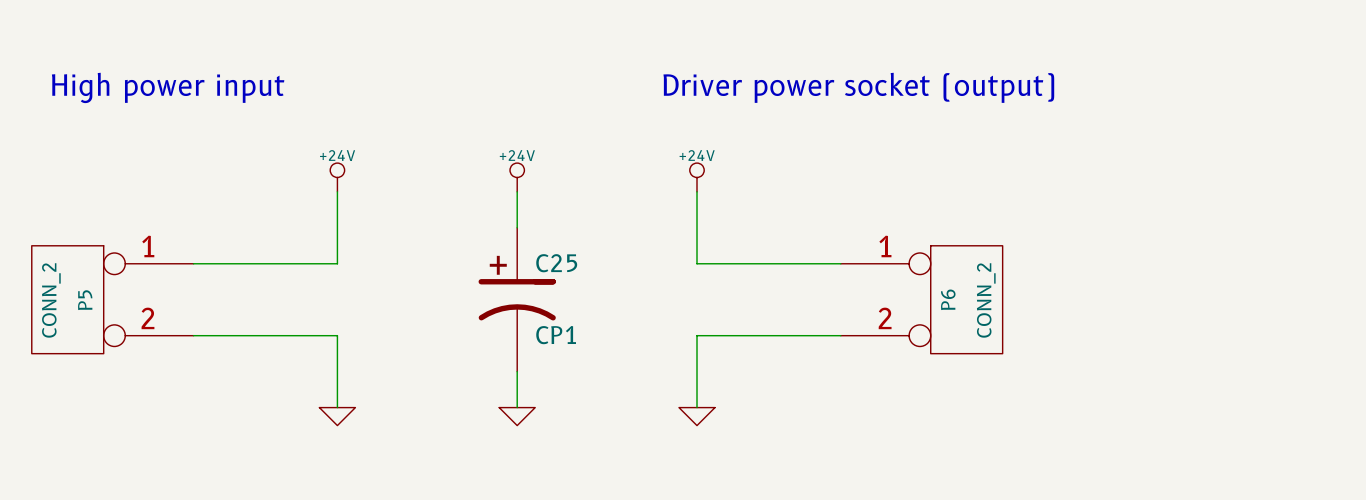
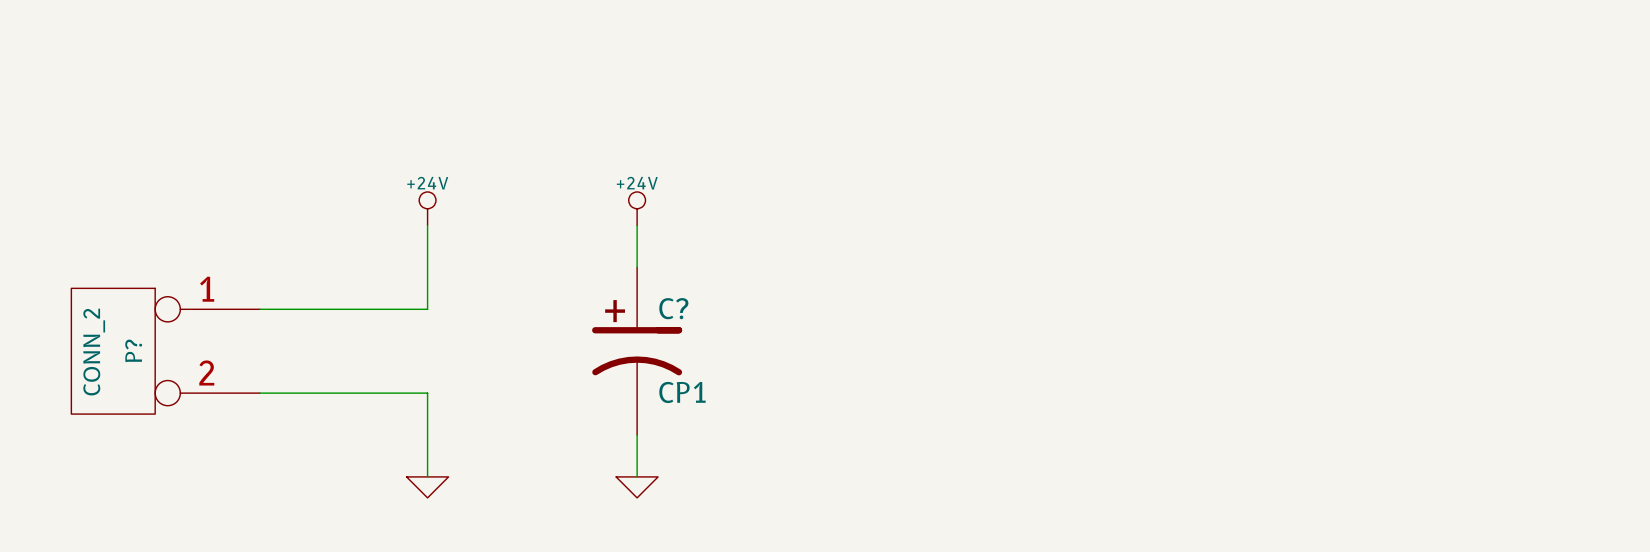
text: High power input (168, 87) -> none
text: Driver power socket (output) (858, 87) -> none
power symbol: +24V (697, 177) -> none
wire: (697, 191) (697, 263) (840, 263) -> none
C25 name: C25 (556, 263) -> C? (673, 308)
P6: CONN_2 (921, 299) -> none
P5 name: P5 (85, 300) -> P? (133, 350)
wire: (840, 335) (697, 335) (697, 407) -> none
power symbol: (697, 416) -> none

